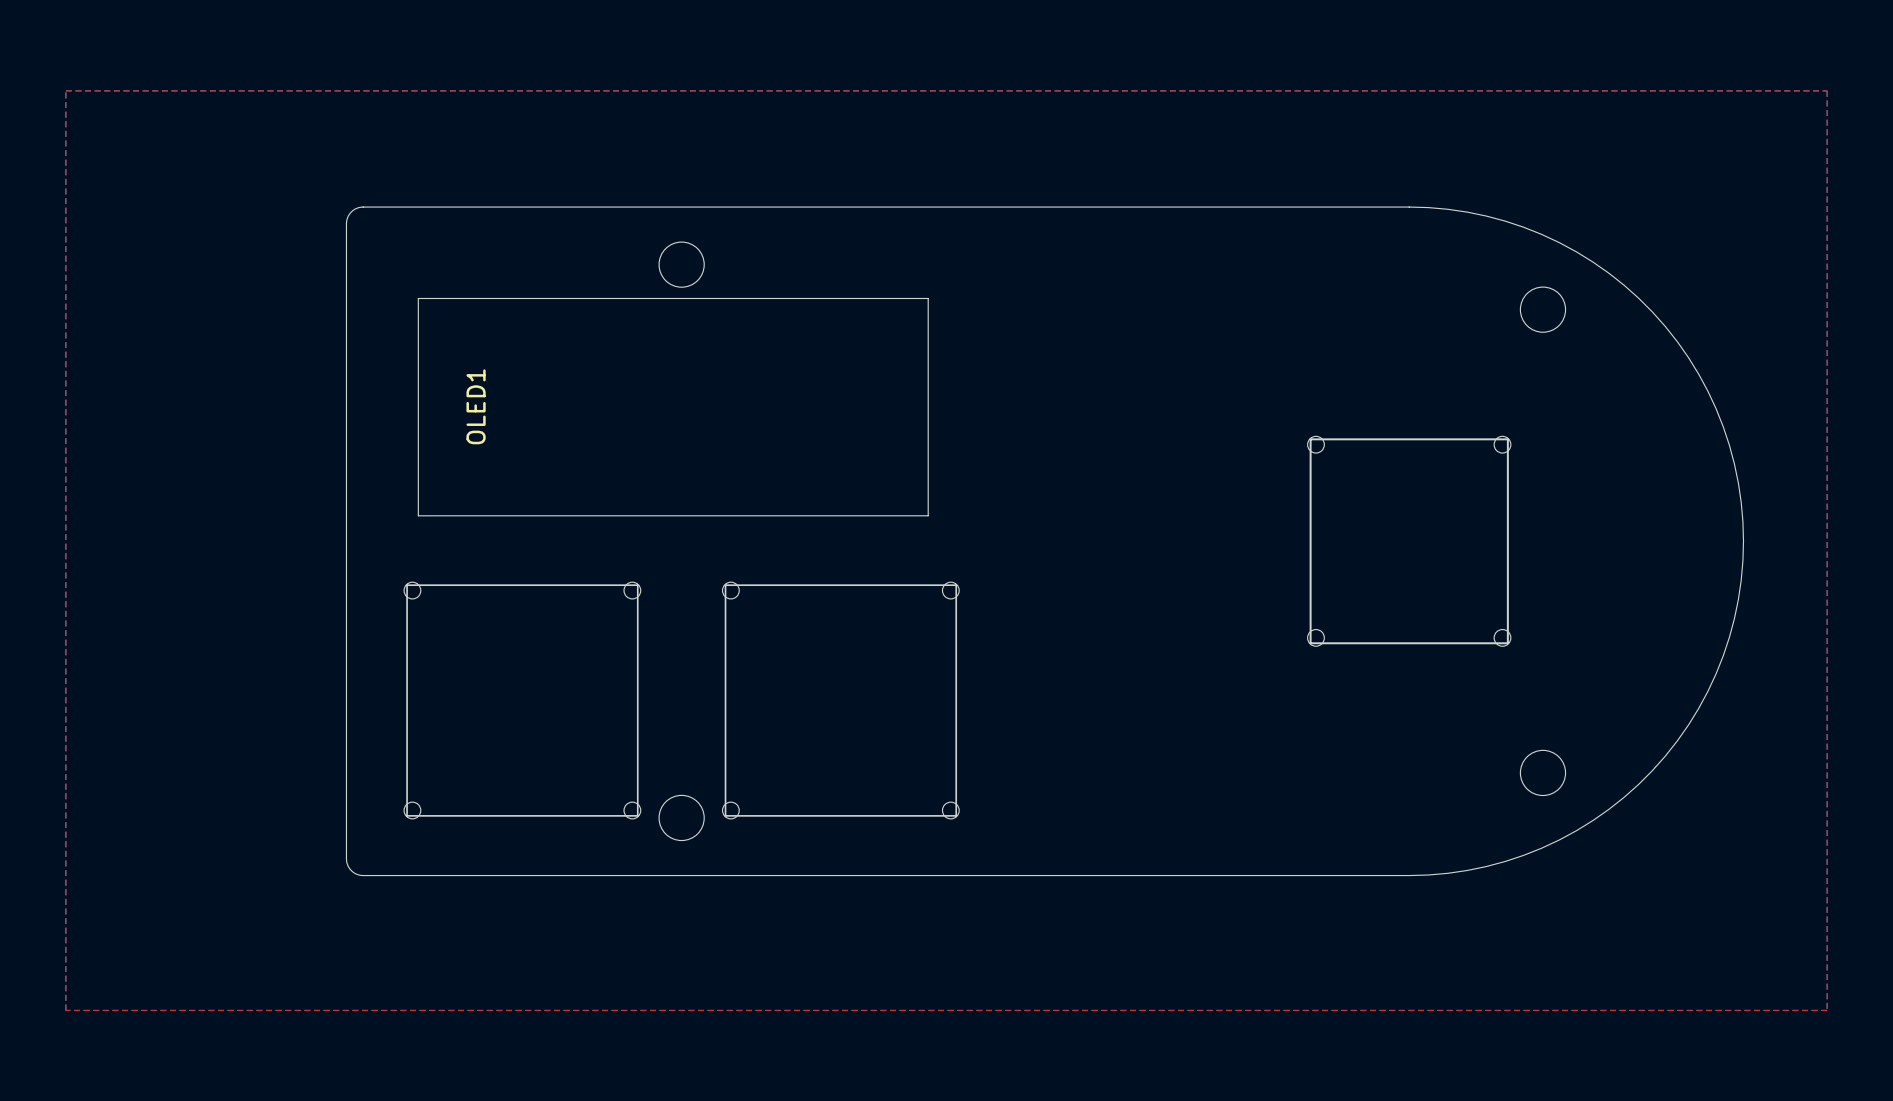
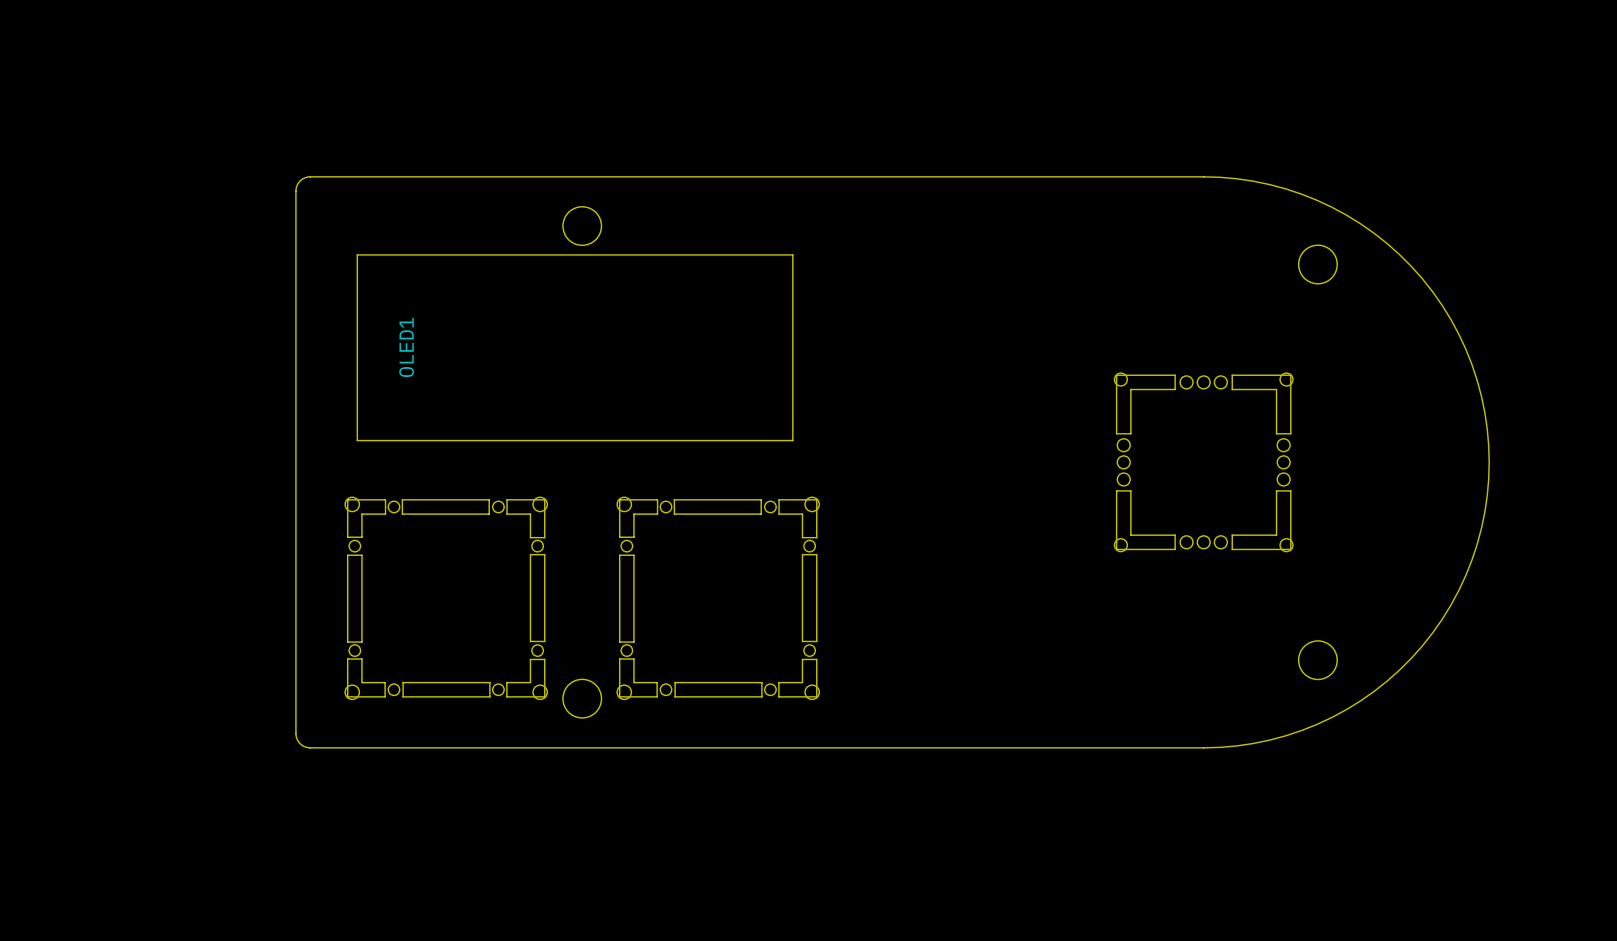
top zone outline: (65, 90) (65, 1010) (1827, 1010) (1827, 90) (65, 90) -> none
part footprint: [1307, 436, 1511, 647] -> [1114, 373, 1293, 552]
part footprint: [404, 582, 641, 819] -> [345, 497, 548, 700]
part footprint: [722, 582, 960, 819] -> [617, 497, 820, 700]

